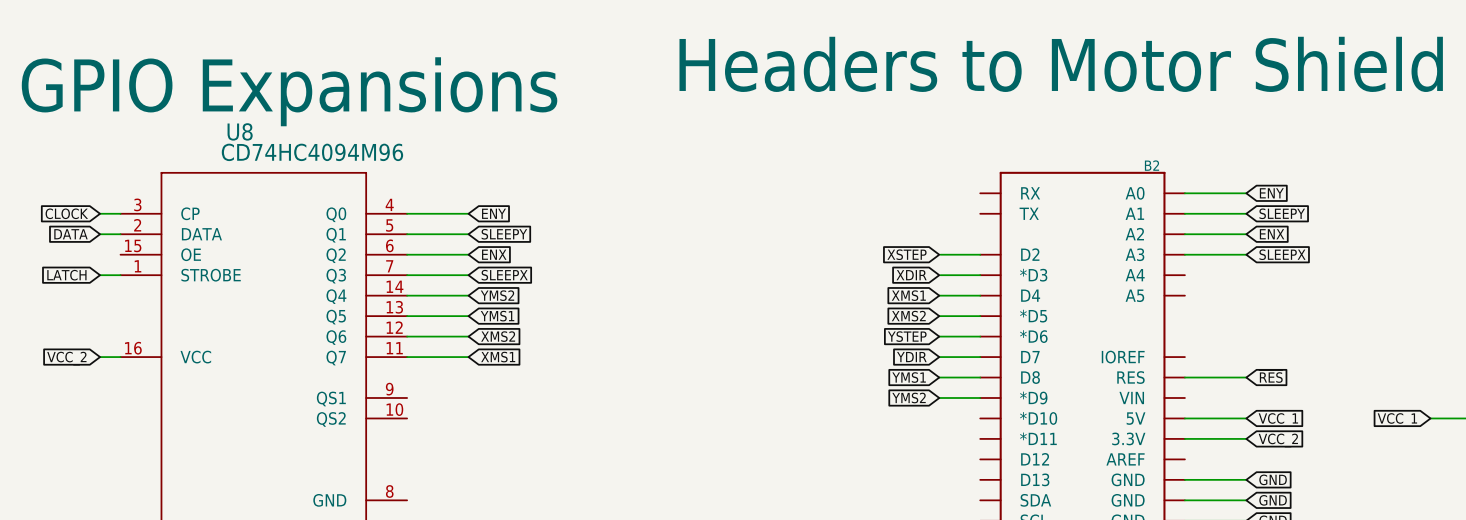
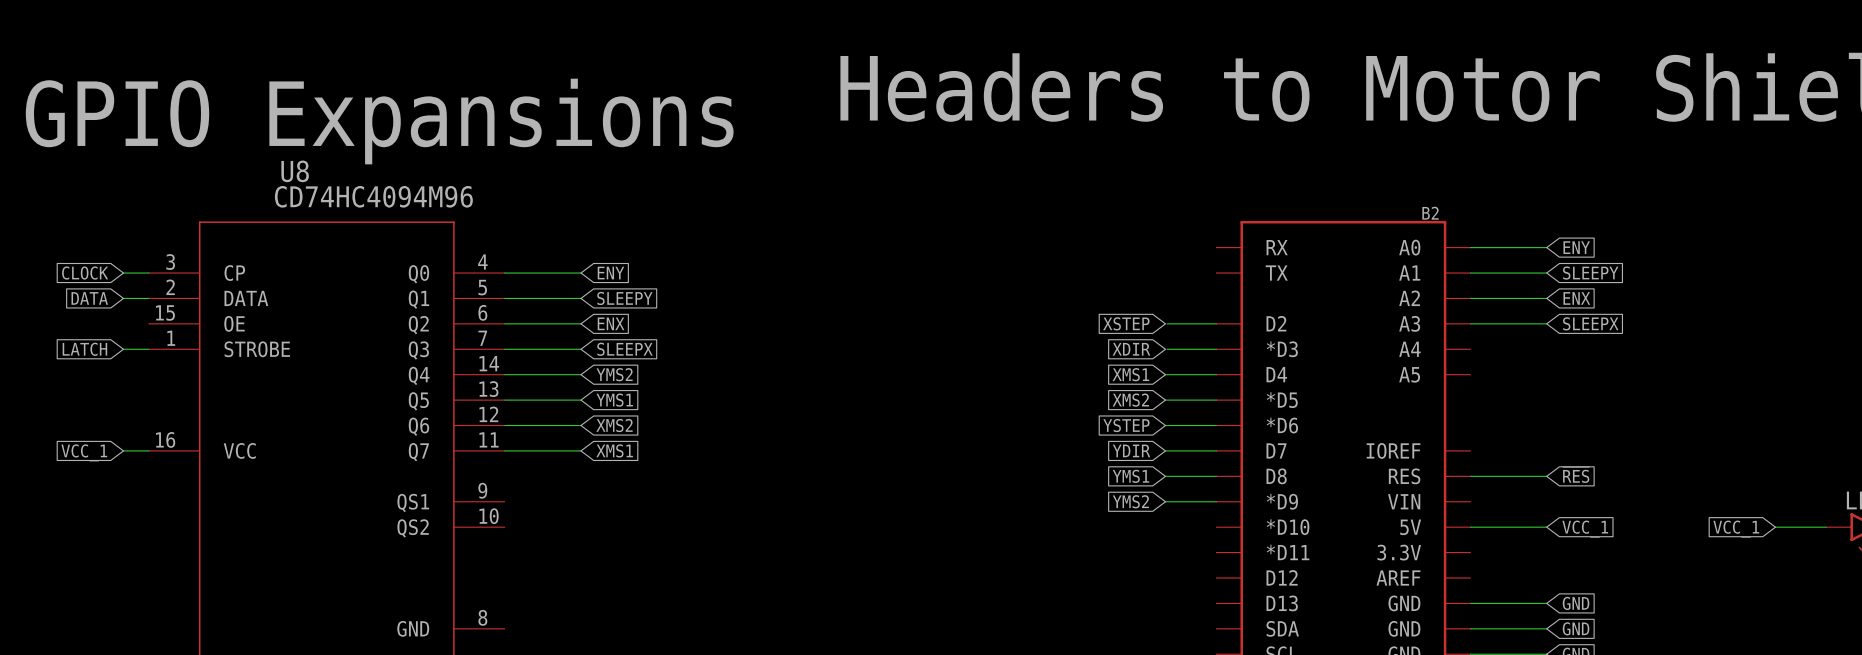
global label: VCC_2 (66, 358) -> VCC_1 (84, 452)
wire: (1184, 438) (1246, 438) -> none
global label: VCC_2 (1278, 440) -> none

